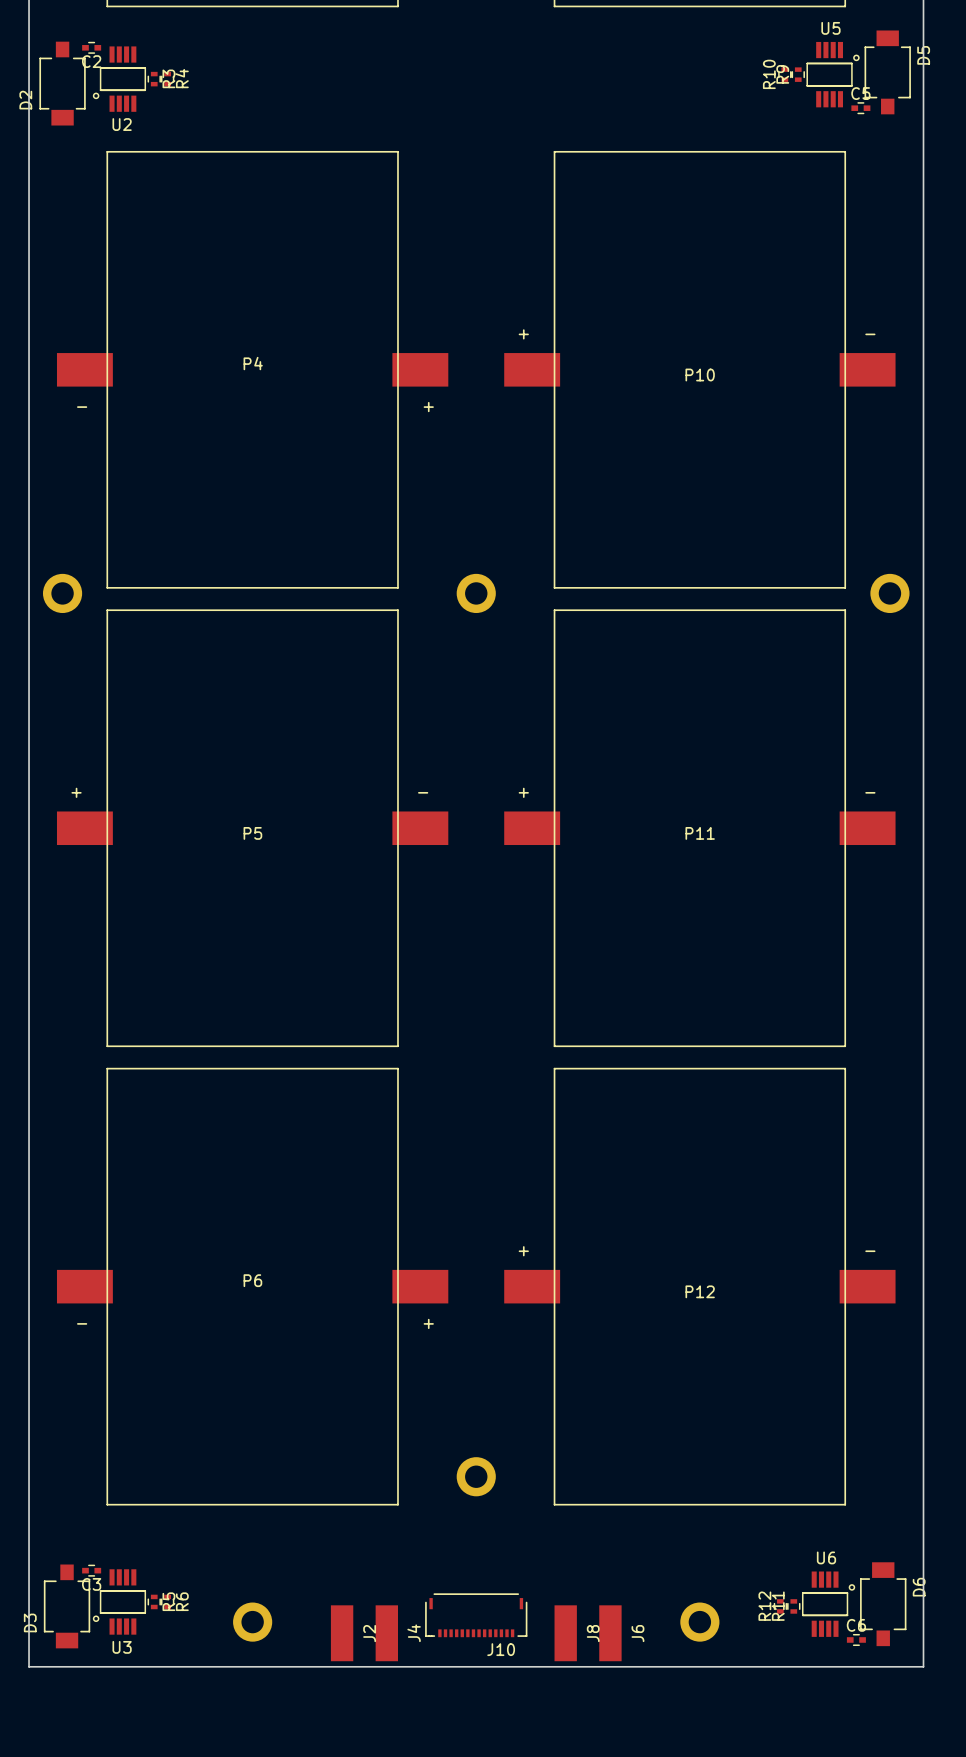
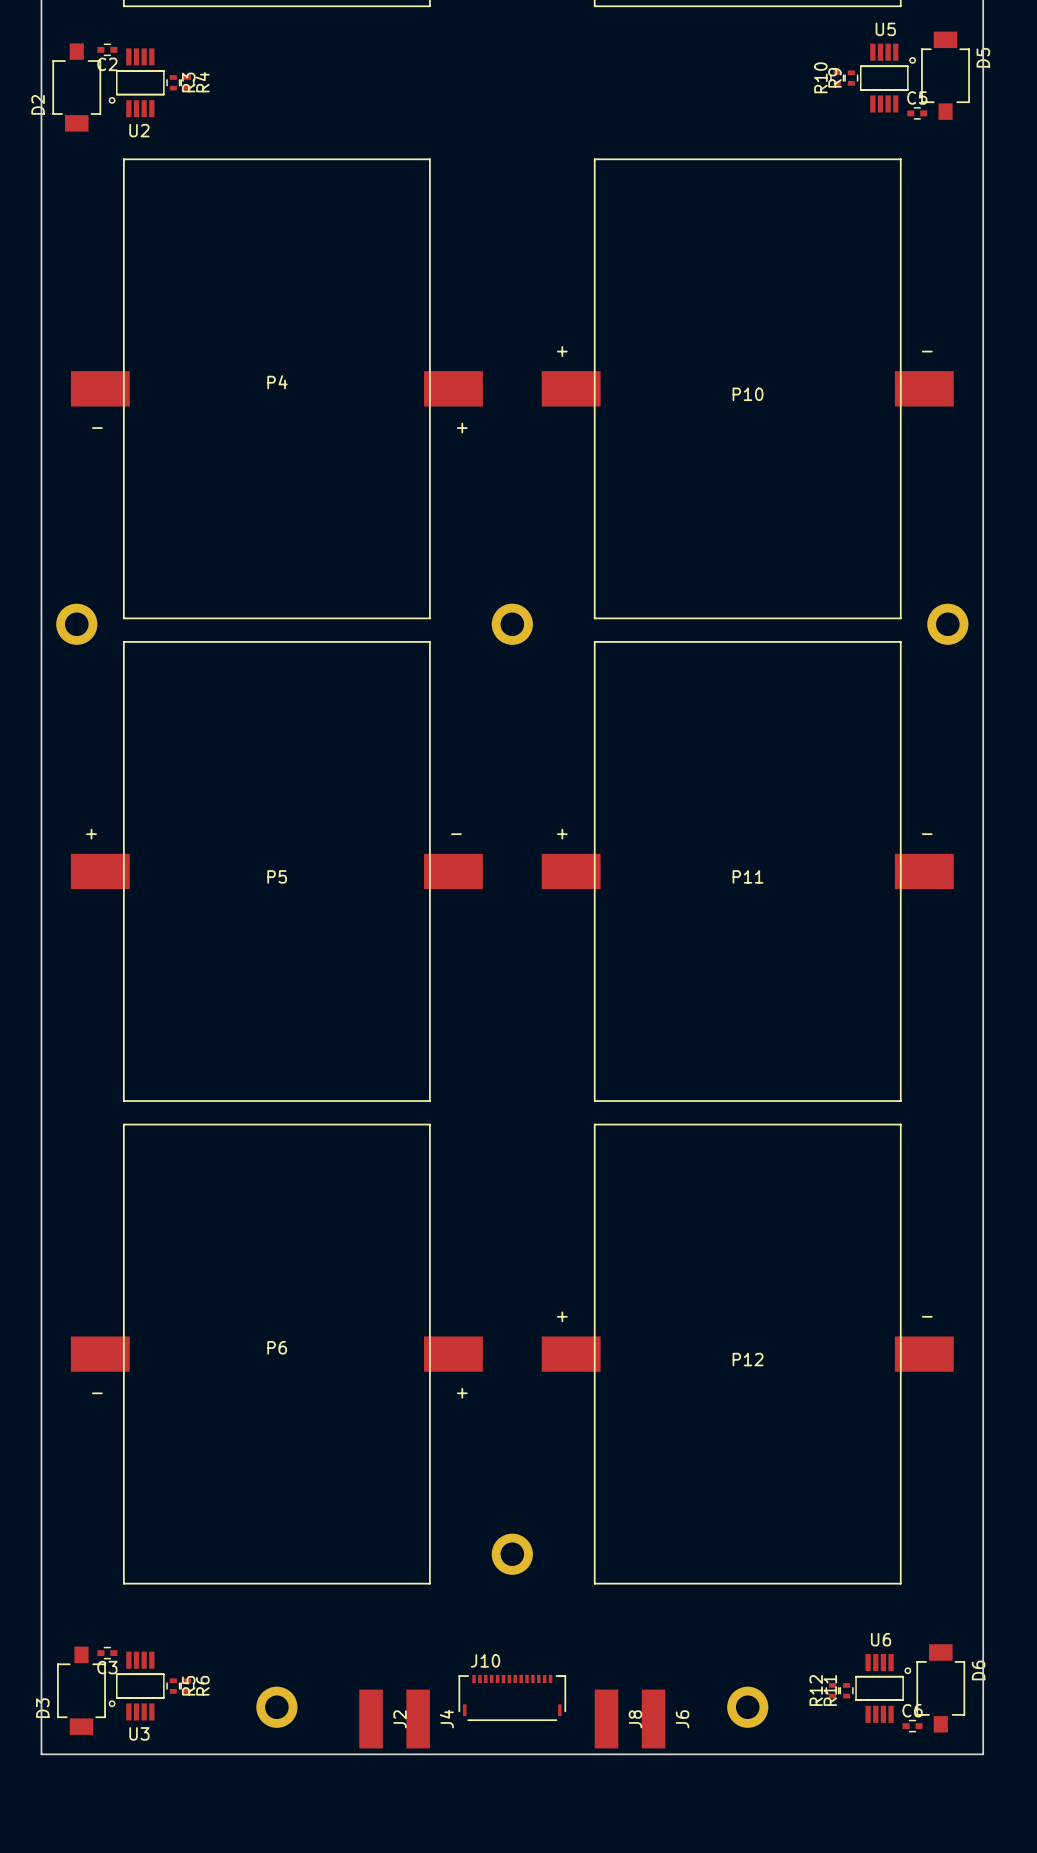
J10 rotation: 0° (476, 1615) -> 180° (512, 1697)

